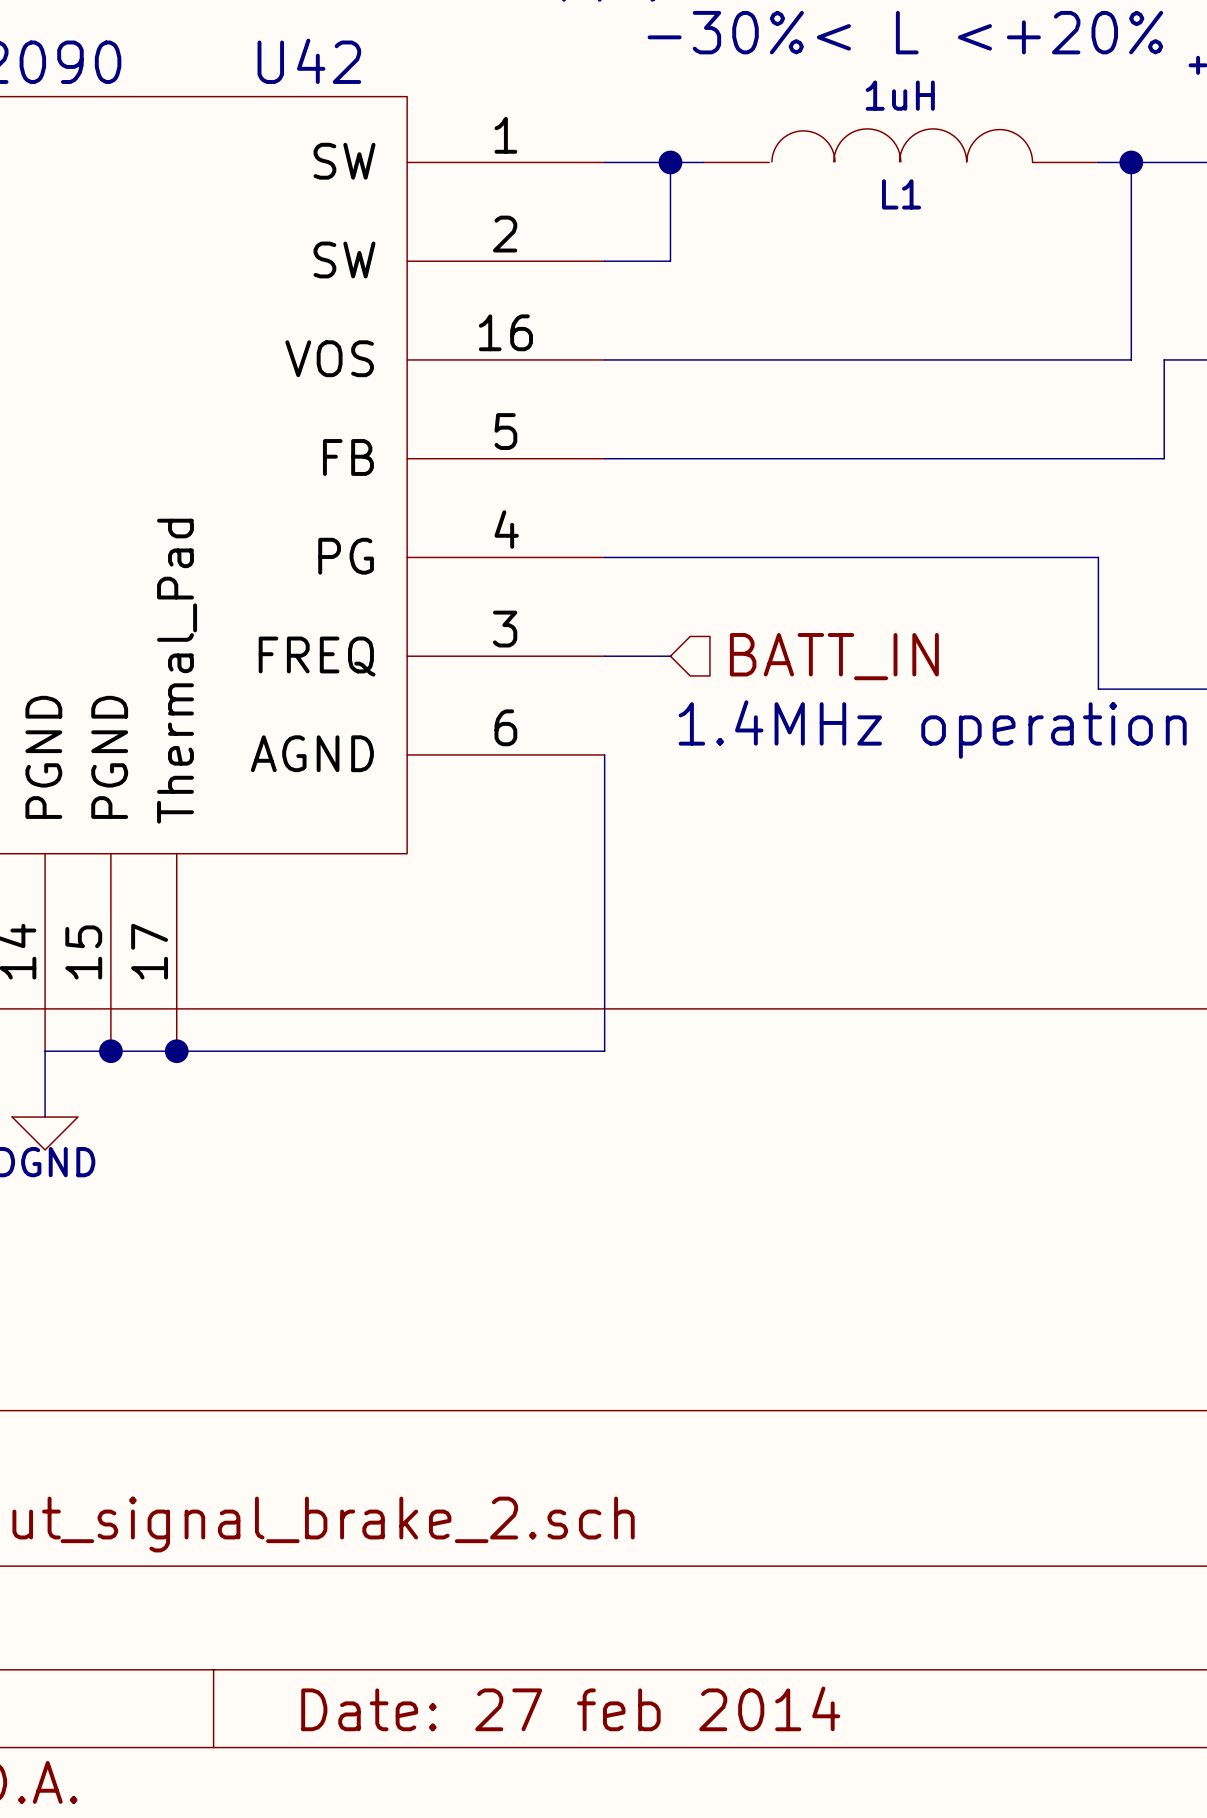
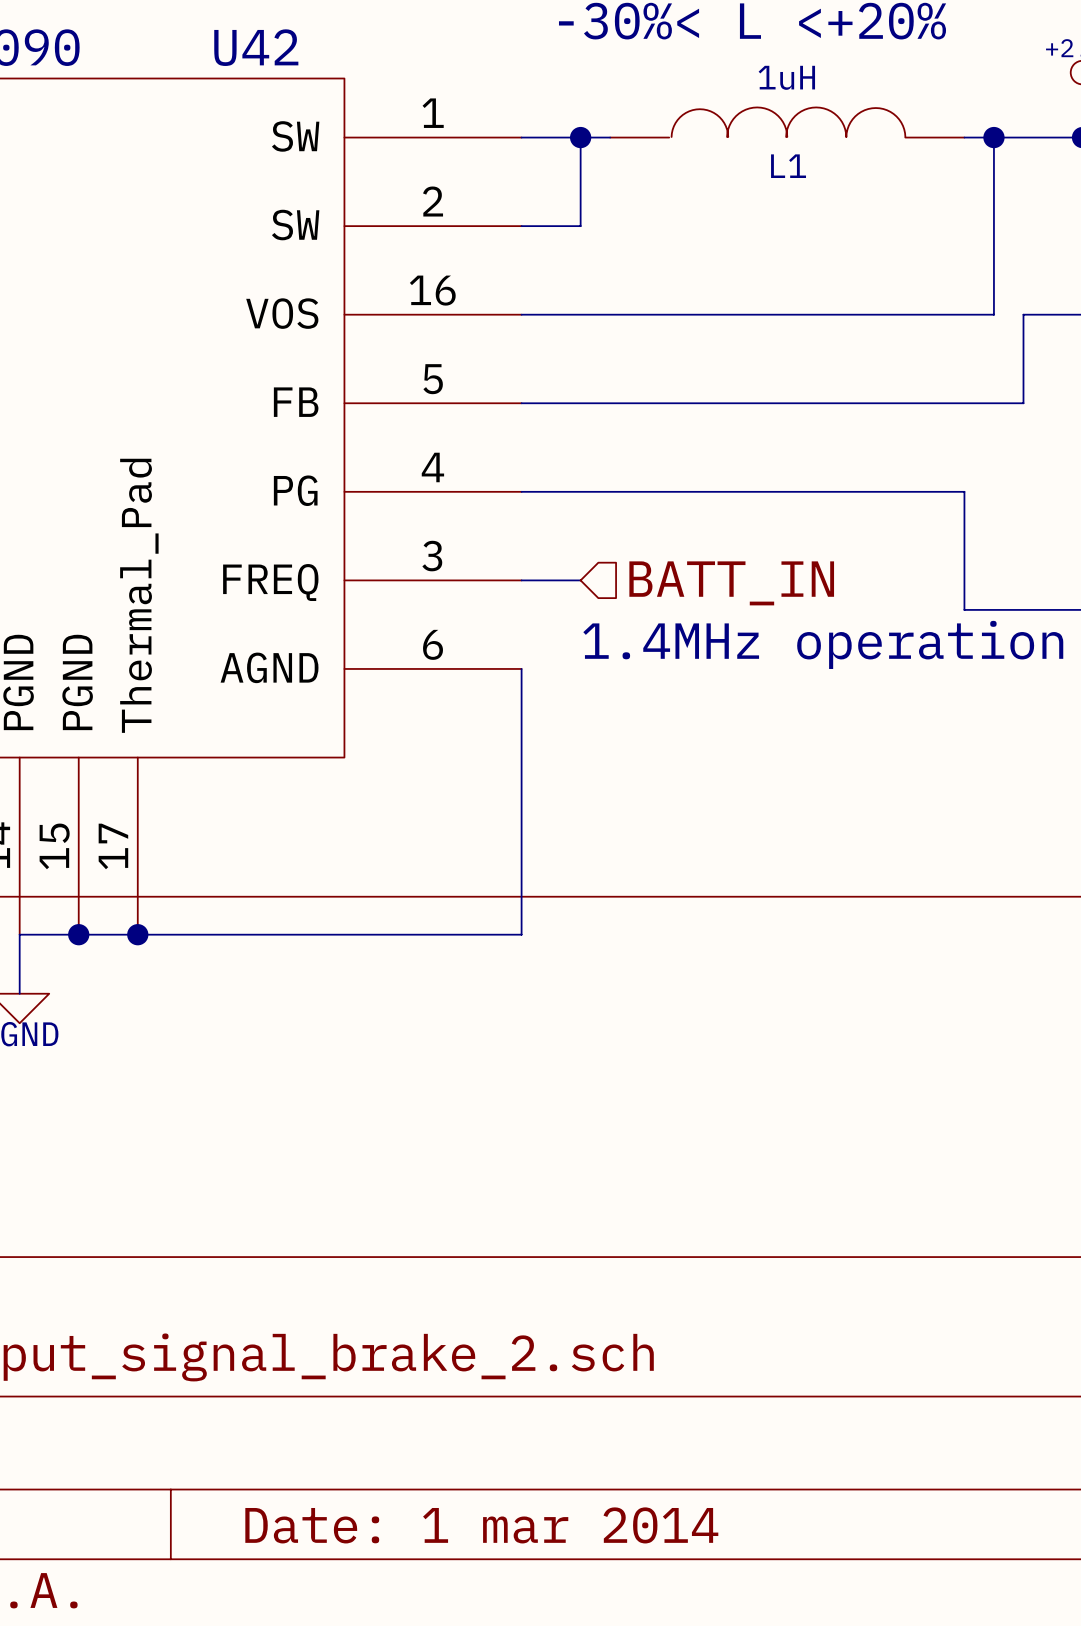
title block: Date: 27 feb 2014 (570, 1708) -> Date: 1 mar 2014 (481, 1525)

